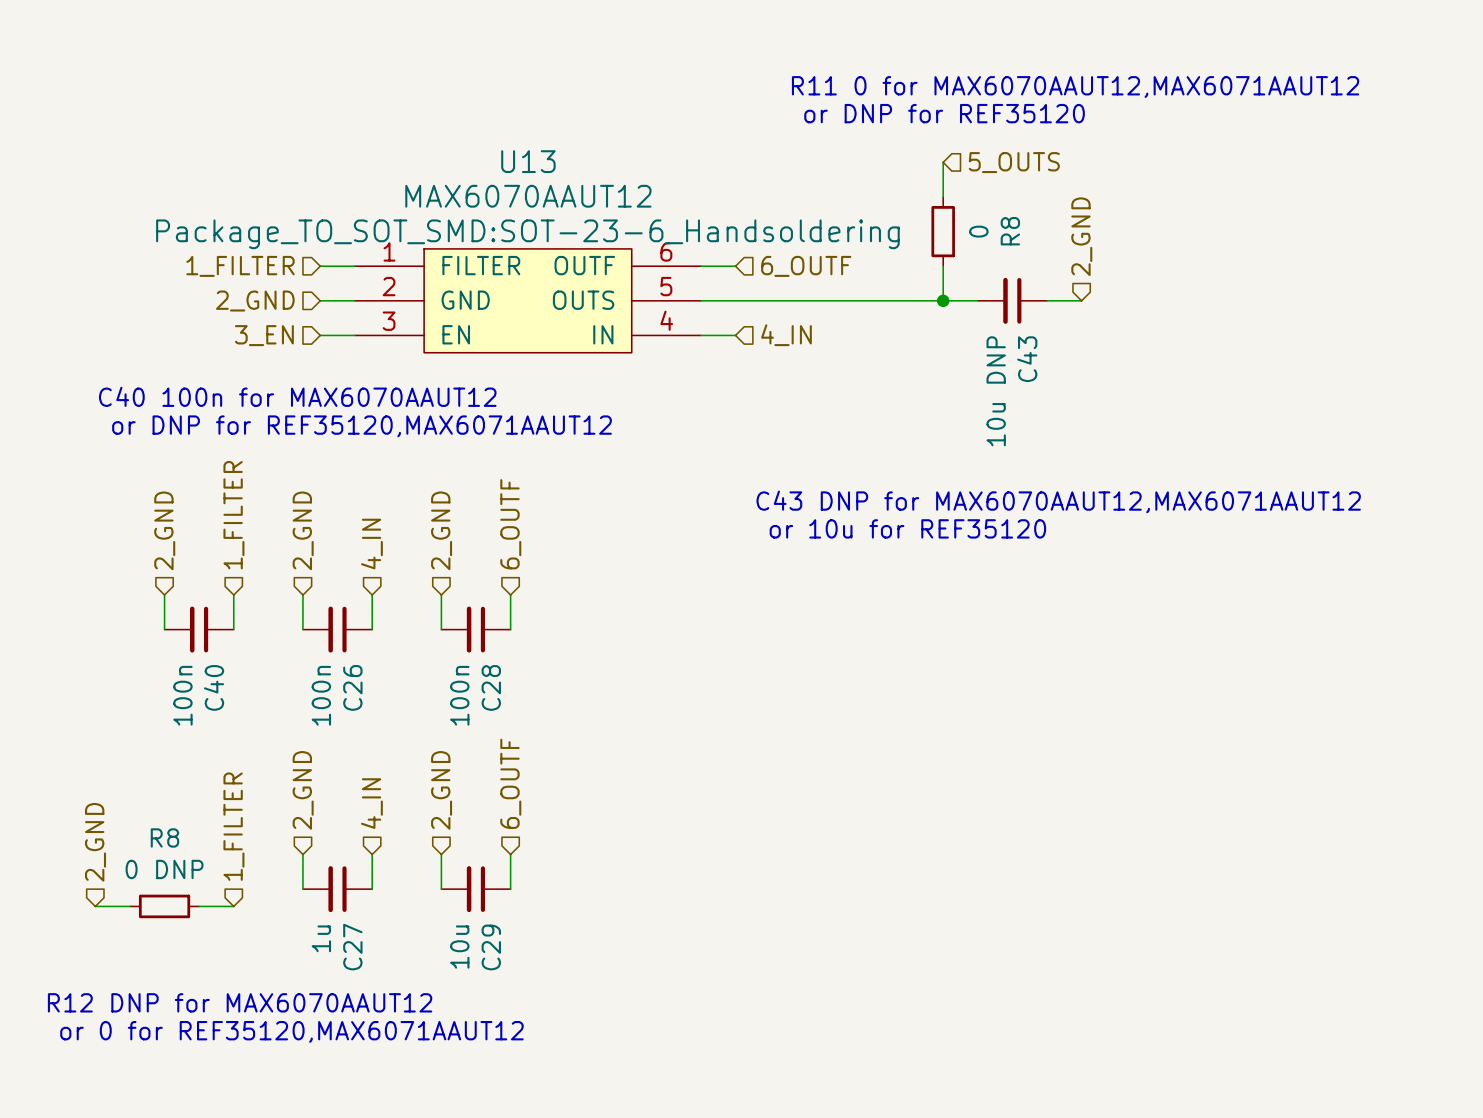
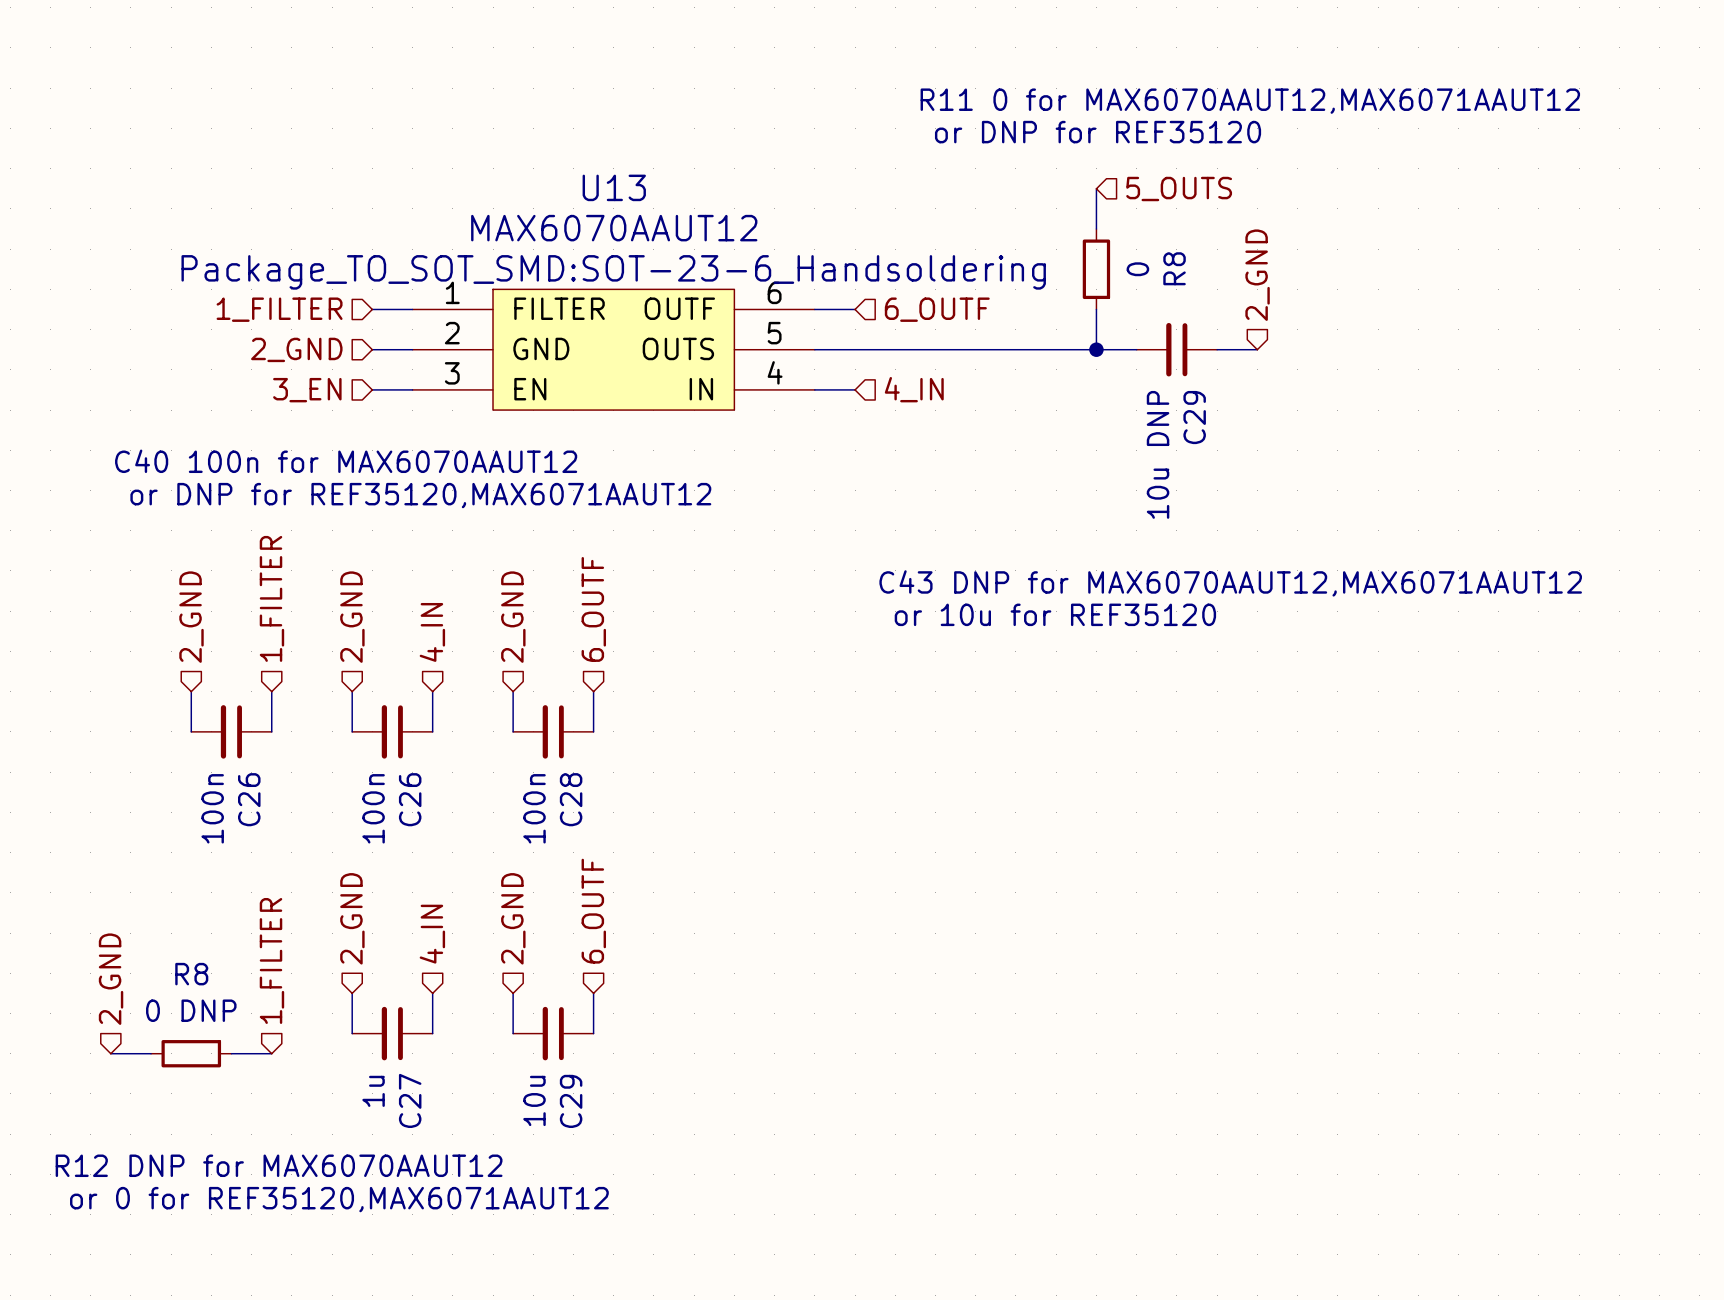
C43 name: C43 (1027, 359) -> C29 (1194, 417)
C40 name: C40 (214, 687) -> C26 (249, 799)

